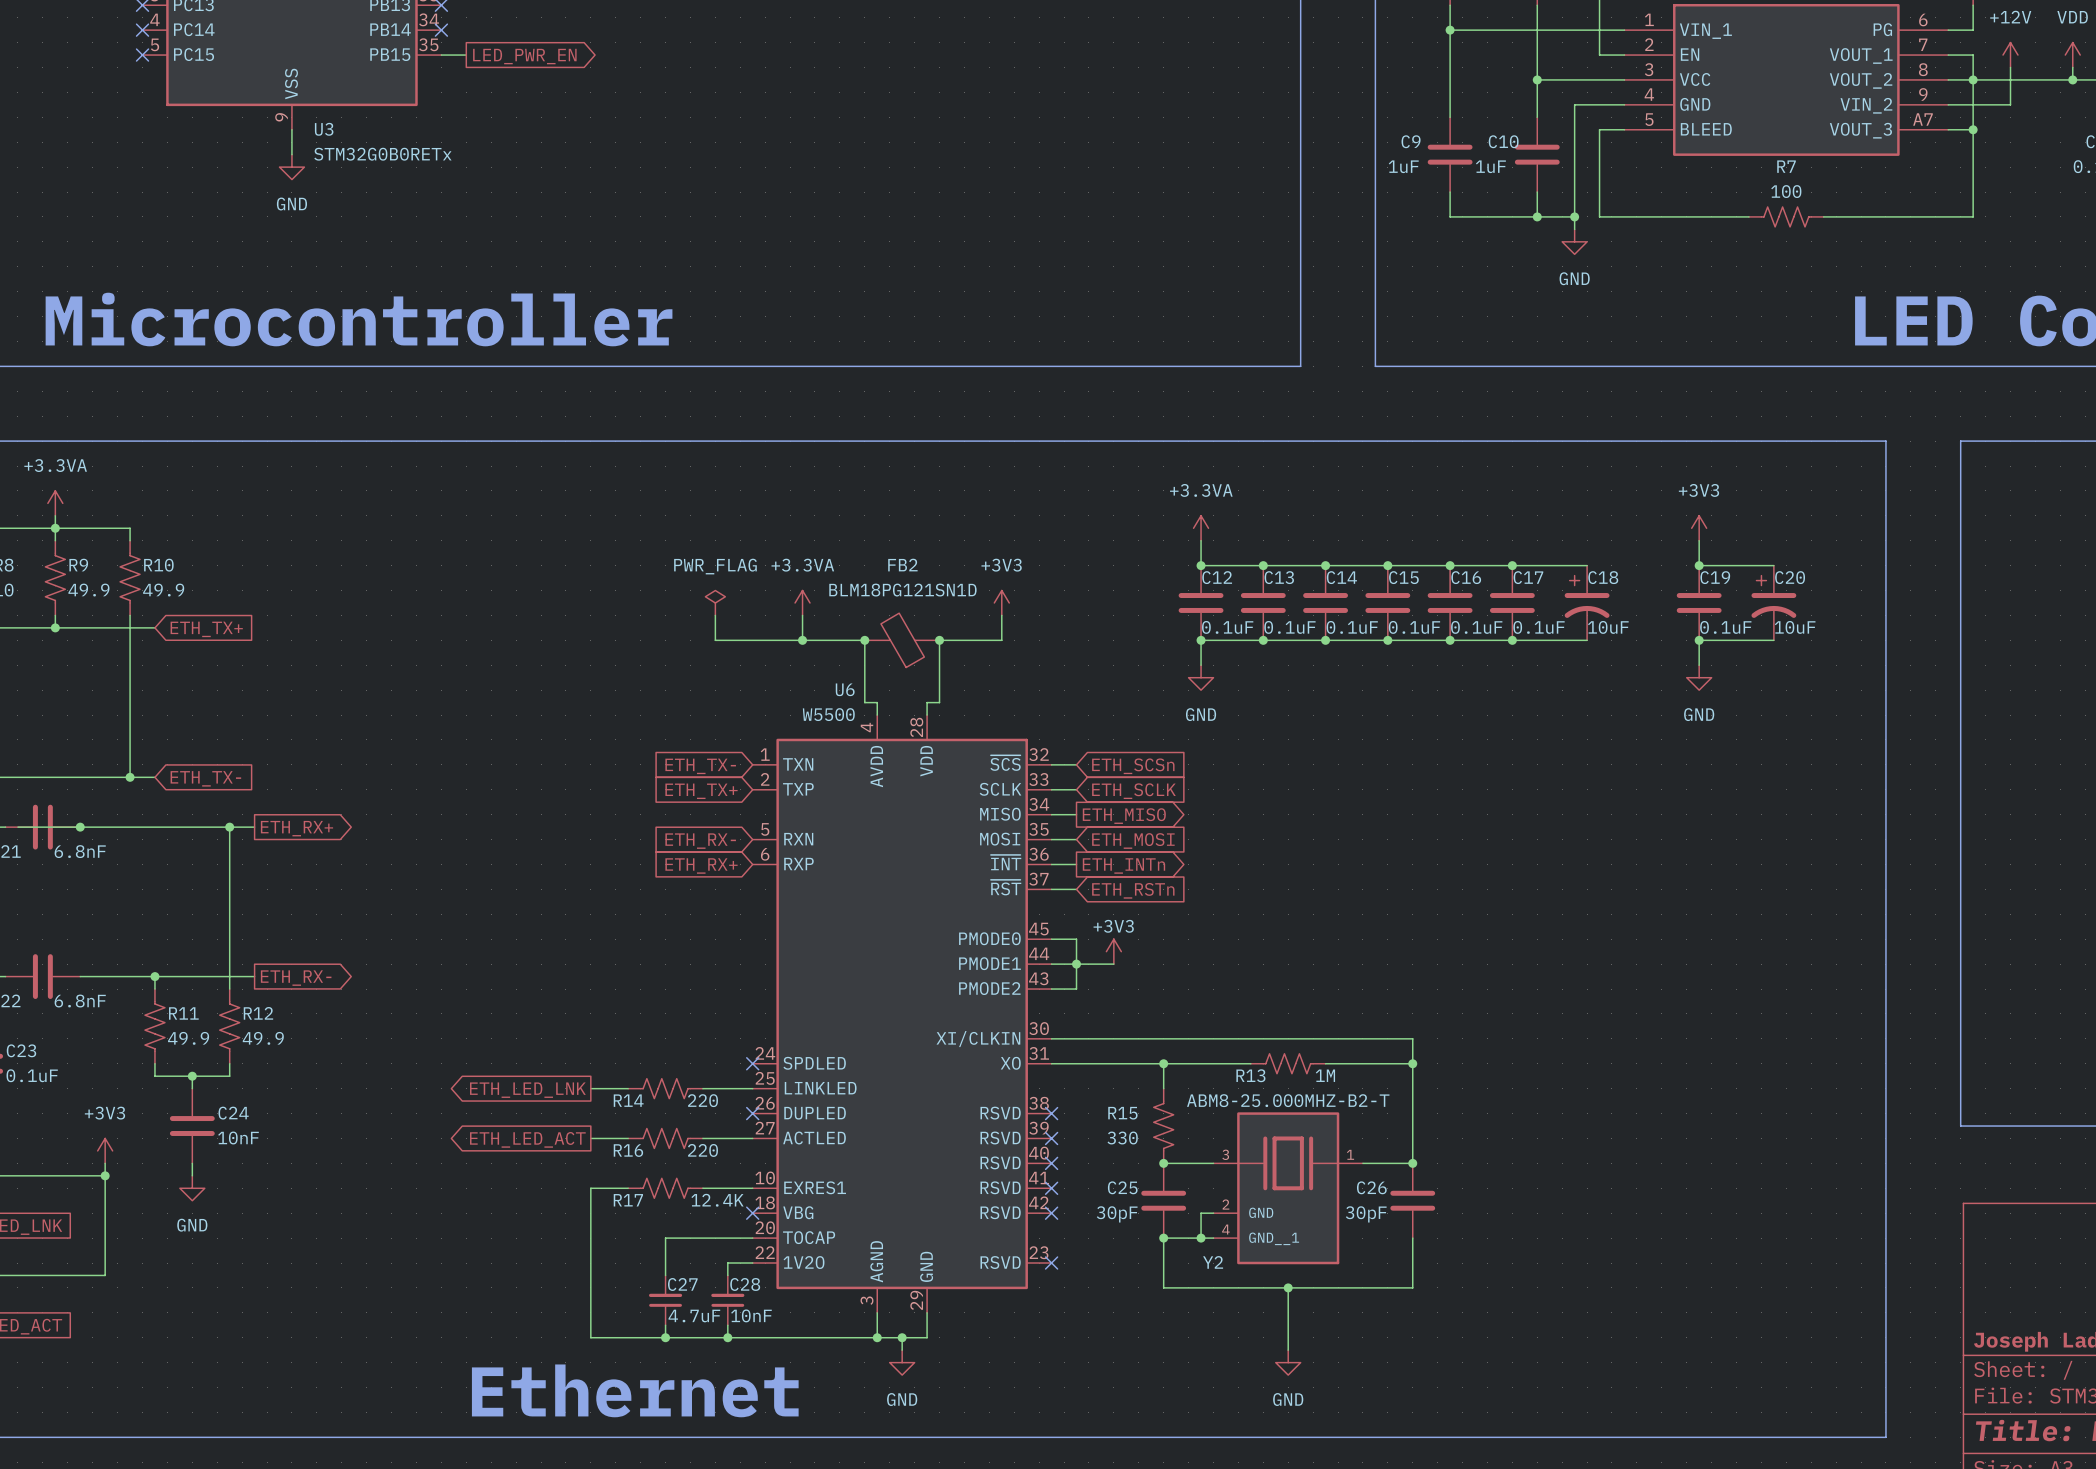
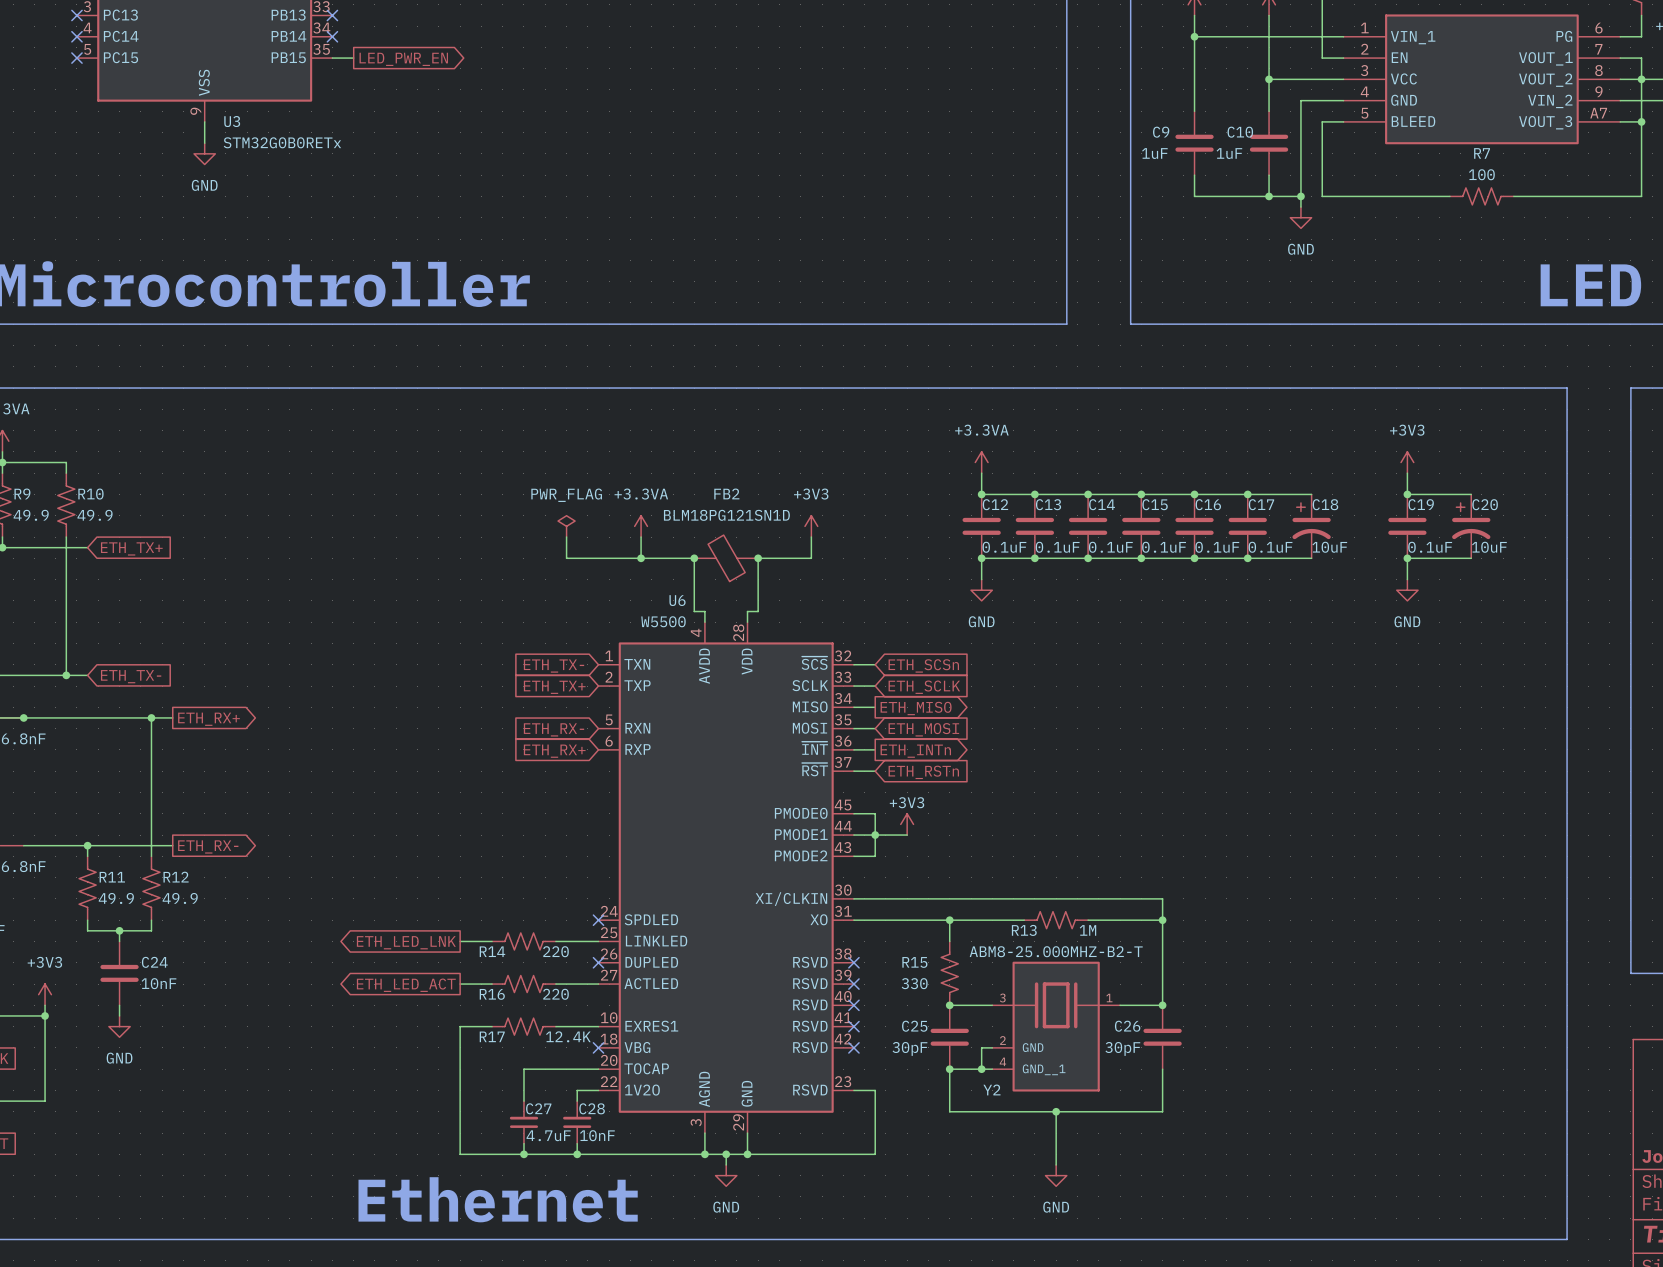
wire: none -> (853, 1090) (875, 1090) (875, 1154) (747, 1154)
no-connect mark: (1051, 1263) -> none
junction: none -> (747, 1154)

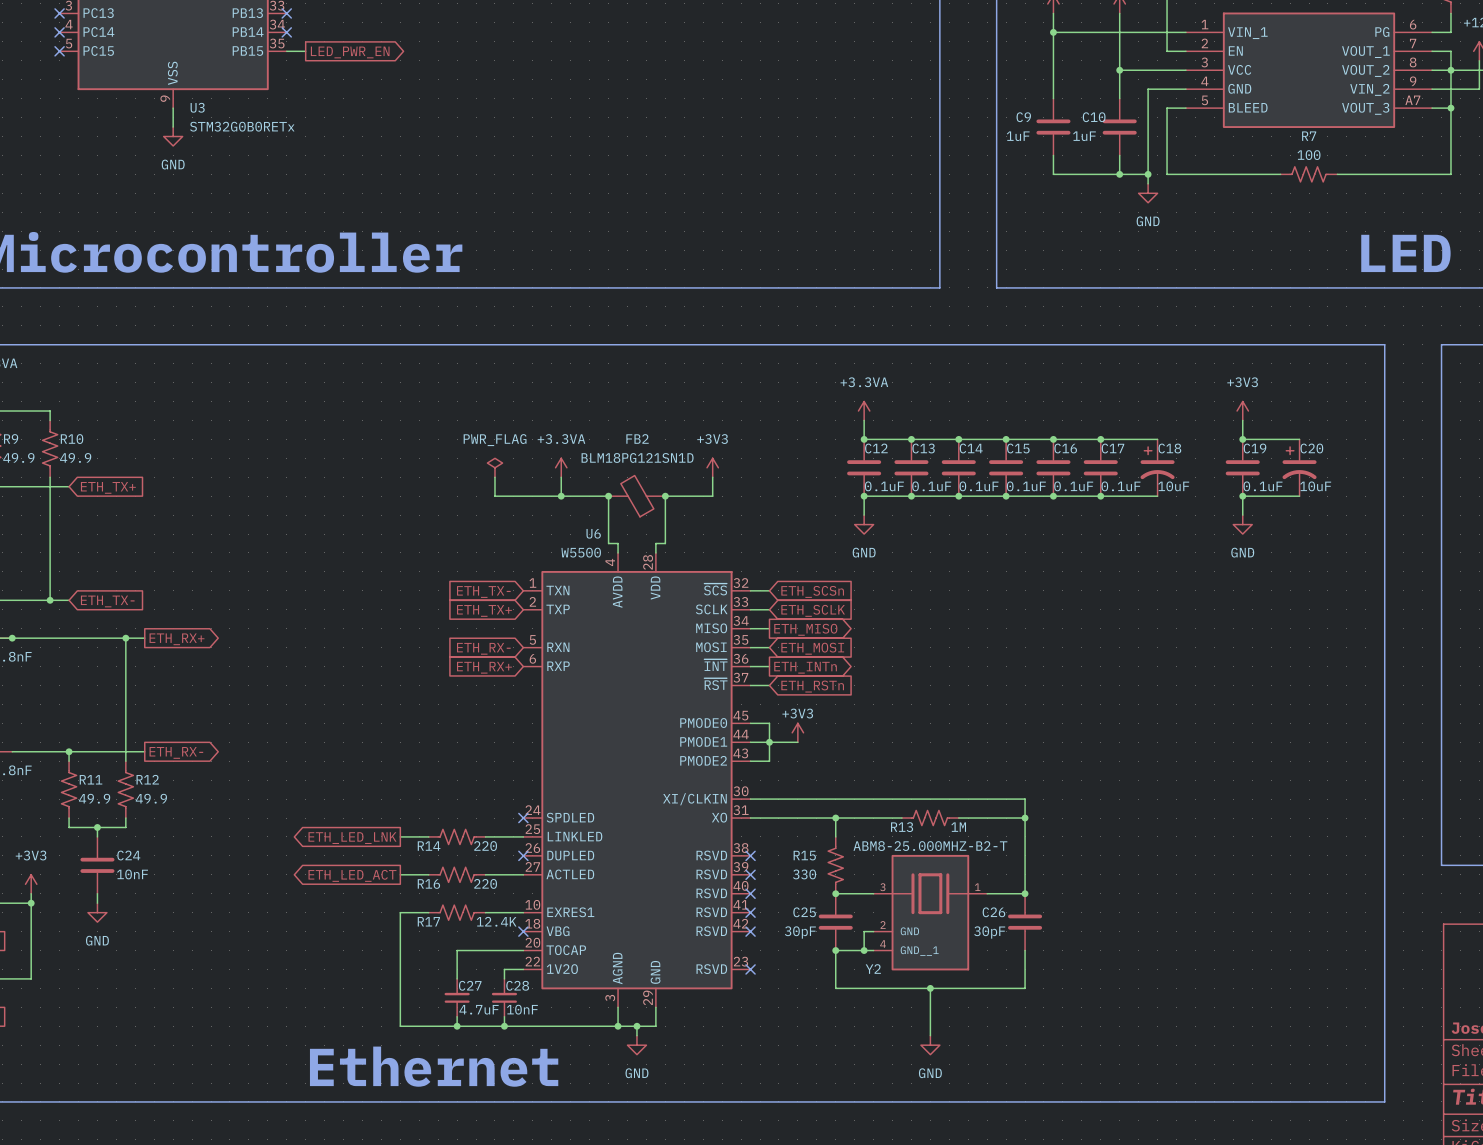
wire: (853, 1090) (875, 1090) (875, 1154) (747, 1154) -> none
no-connect mark: none -> (750, 969)
junction: (747, 1154) -> none

